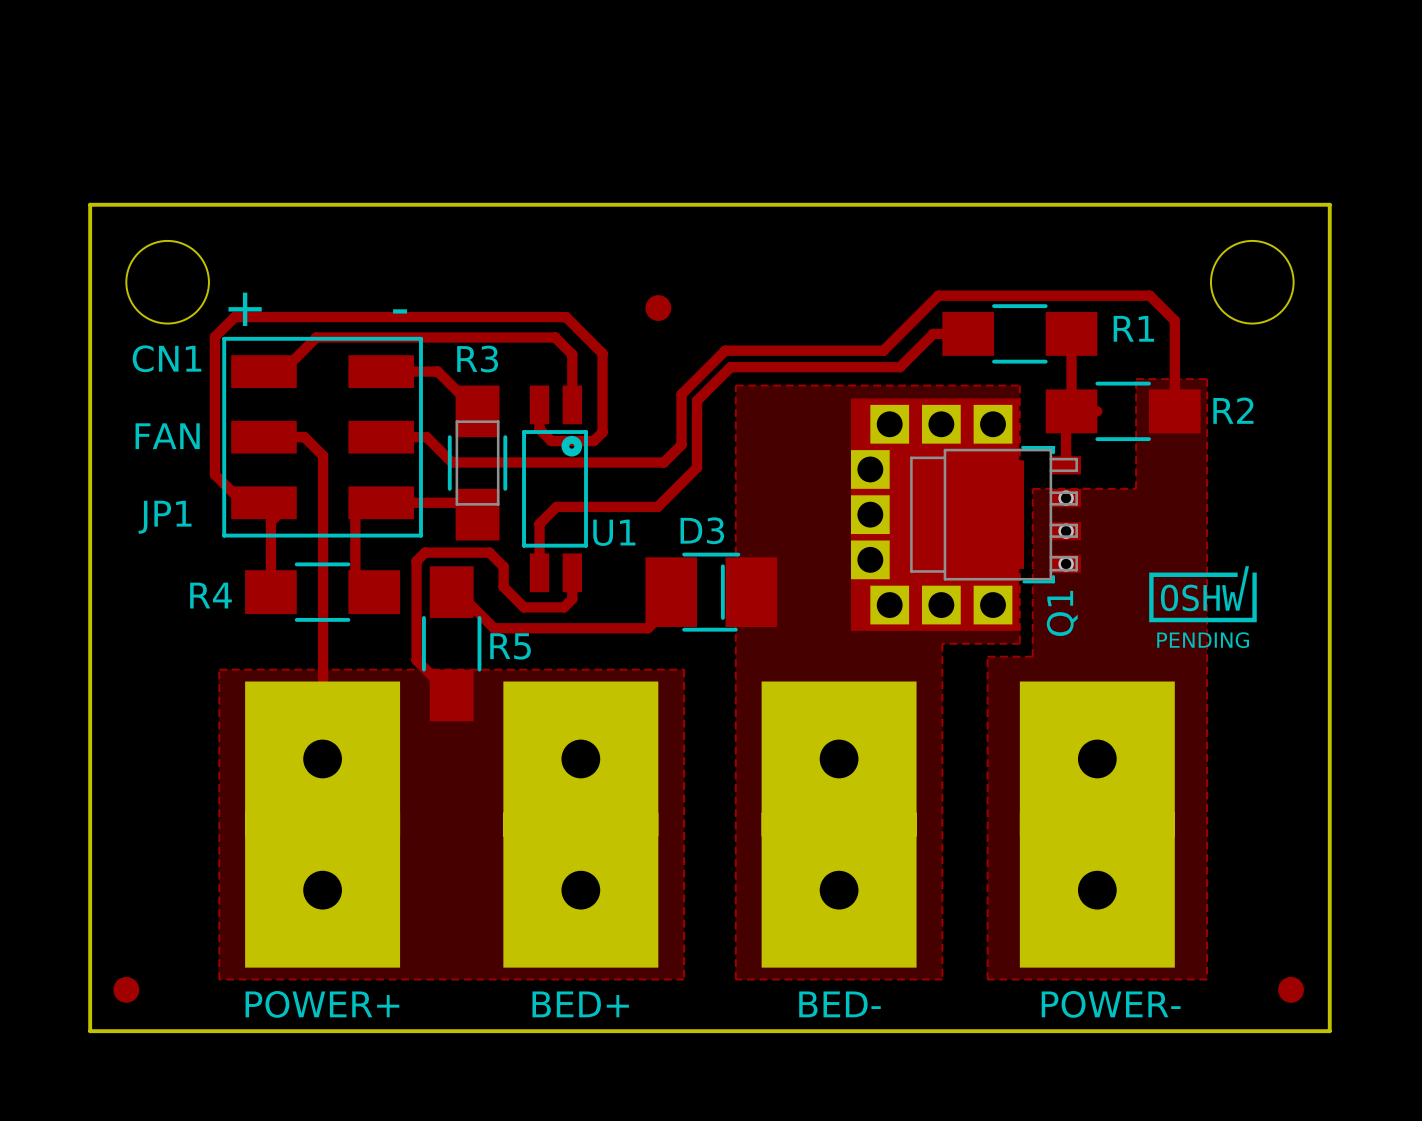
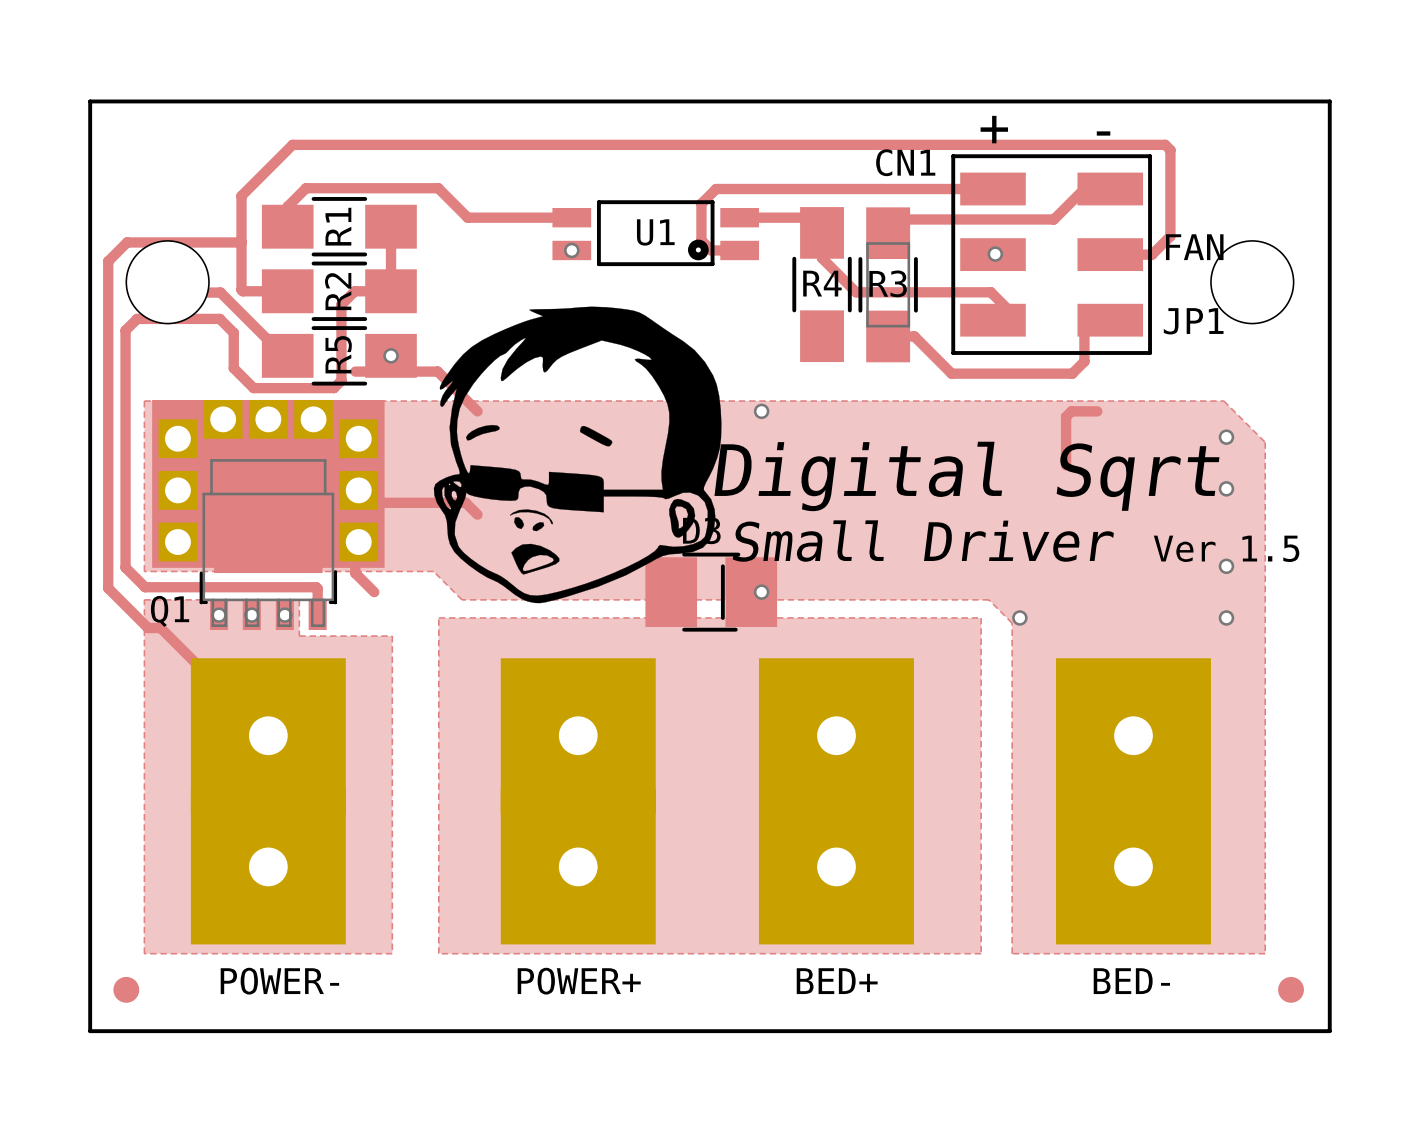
text: none -> + (994, 129)
text: none -> - (1103, 133)
track: none -> (1018, 189) (716, 189) (701, 203) (701, 240) (711, 250) (739, 250)
track: none -> (1084, 189) (1053, 219) (901, 219) (888, 233)
board edge: (90, 204) (1329, 204) -> (90, 204) (90, 101) (1329, 101) (1329, 204)
track: none -> (571, 217) (467, 217) (438, 188) (306, 188) (287, 206) (287, 226)
track: none -> (739, 217) (806, 217) (822, 232) (822, 258) (856, 292) (990, 292) (1018, 320)
track: none -> (391, 226) (391, 291) (354, 291) (341, 304) (341, 380) (333, 388) (253, 388) (233, 368) (233, 332) (219, 318) (137, 318) (125, 330) (125, 567) (145, 587) (316, 587) (317, 615)
track: none -> (241, 242) (127, 242) (108, 261) (108, 588) (148, 628) (160, 628) (268, 735)
text: none -> FAN (1194, 247)
via: none -> (571, 250)
via: none -> (995, 254)
track: none -> (1084, 254) (1152, 254) (1170, 236) (1170, 150) (1165, 144) (292, 144) (241, 195) (241, 289) (287, 291)
track: none -> (188, 292) (220, 292) (283, 355) (287, 355)
drawing: none -> [433, 306, 722, 604]
part: (658, 308) -> none
text: + (245, 309) -> none
text: - (400, 311) -> none
track: none -> (888, 318) (888, 336) (914, 336) (951, 373) (1072, 373) (1084, 361) (1084, 320)
text: none -> JP1 (1193, 321)
R1 name rotation: 0° (1133, 328) -> 90° counterclockwise (338, 226)
R1 name position: R1 (1133, 328) -> R1 (338, 226)
track: (968, 333) (933, 333) (900, 367) (730, 367) (697, 400) (697, 467) (657, 506) (556, 506) (539, 523) (539, 572) -> none
R1 position: (1019, 333) -> (339, 226)
track: (1071, 333) (1071, 411) -> none
via: none -> (391, 355)
CN1 name position: CN1 (167, 358) -> CN1 (905, 162)
R3 name position: R3 (477, 359) -> R3 (888, 283)
track: (289, 371) (289, 364) (316, 337) (555, 337) (572, 354) (572, 404) -> none
zone outline: (1136, 379) (1136, 488) (1032, 488) (1032, 656) (987, 656) (987, 979) (1207, 979) (1207, 379) (1136, 379) -> none
zone outline: (735, 385) (735, 979) (942, 979) (942, 643) (1019, 643) (1019, 385) (735, 385) -> none
zone outline: none -> (144, 401) (144, 571) (433, 571) (462, 599) (988, 599) (1012, 623) (1012, 953) (1265, 953) (1265, 442) (1223, 401) (144, 401)
track: (539, 404) (539, 429) (551, 441) (593, 441) (602, 432) (602, 353) (566, 317) (234, 317) (214, 336) (214, 474) (243, 502) (289, 502) (270, 521) (270, 592) -> none
R2 name rotation: 0° (1233, 410) -> 90° counterclockwise (338, 291)
R2 name position: R2 (1233, 410) -> R2 (338, 291)
via: none -> (761, 411)
R2 position: (1123, 411) -> (339, 291)
track: (1174, 411) (1174, 320) (1149, 295) (938, 295) (883, 350) (725, 350) (681, 394) (681, 444) (664, 462) (451, 462) (426, 437) (355, 437) -> none
text: FAN (167, 436) -> none
track: (289, 437) (304, 437) (323, 455) (322, 758) -> none
CN1 position: (322, 437) -> (1051, 254)
via: none -> (1226, 437)
R3 position: (477, 463) -> (888, 284)
text: none -> Digital Sqrt (966, 476)
U1 rotation: 0° (555, 488) -> 90° clockwise (655, 233)
U1 position: (555, 488) -> (655, 233)
via: none -> (1226, 488)
via: (1066, 498) -> none
Q1 rotation: 0° (965, 514) -> 90° clockwise (268, 514)
Q1 position: (965, 514) -> (268, 514)
text: JP1 (165, 517) -> none
via: (1066, 531) -> none
U1 name position: U1 (614, 532) -> U1 (655, 232)
text: none -> Small Driver (923, 541)
text: none -> Ver 1.5 (1226, 548)
via: (1066, 563) -> none
drawing: [1149, 566, 1257, 623] -> none
via: none -> (1226, 566)
track: (572, 572) (572, 599) (564, 607) (524, 607) (503, 586) (503, 566) (489, 552) (425, 552) (416, 561) (416, 660) (451, 695) -> none
R4 rotation: 0° (322, 592) -> 90° clockwise (822, 284)
R4 position: (322, 592) -> (822, 284)
track: (451, 592) (457, 592) (494, 628) (647, 628) (684, 592) -> none
via: none -> (761, 592)
R4 name position: R4 (210, 595) -> R4 (822, 283)
zone outline: none -> (144, 599) (299, 599) (299, 636) (392, 636) (392, 953) (144, 953) (144, 599)
via: none -> (219, 615)
via: none -> (251, 615)
via: none -> (284, 615)
zone outline: none -> (438, 617) (438, 953) (981, 953) (981, 617) (438, 617)
via: none -> (1019, 617)
via: none -> (1226, 617)
R5 rotation: 0° (451, 643) -> 90° clockwise (339, 355)
R5 position: (451, 643) -> (339, 355)
R5 name position: R5 (510, 646) -> R5 (338, 354)
zone outline: (219, 669) (219, 979) (684, 979) (684, 669) (219, 669) -> none
POWER-: none -> (268, 801)
BED-: none -> (1133, 801)
POWER+: (322, 824) -> none
BED+ position: (580, 824) -> (578, 801)
BED- position: (839, 824) -> (836, 801)
POWER-: (1097, 824) -> none
BED+ name: BED+ (580, 1004) -> POWER+ (579, 981)
BED- name: BED- (839, 1004) -> BED+ (837, 981)

